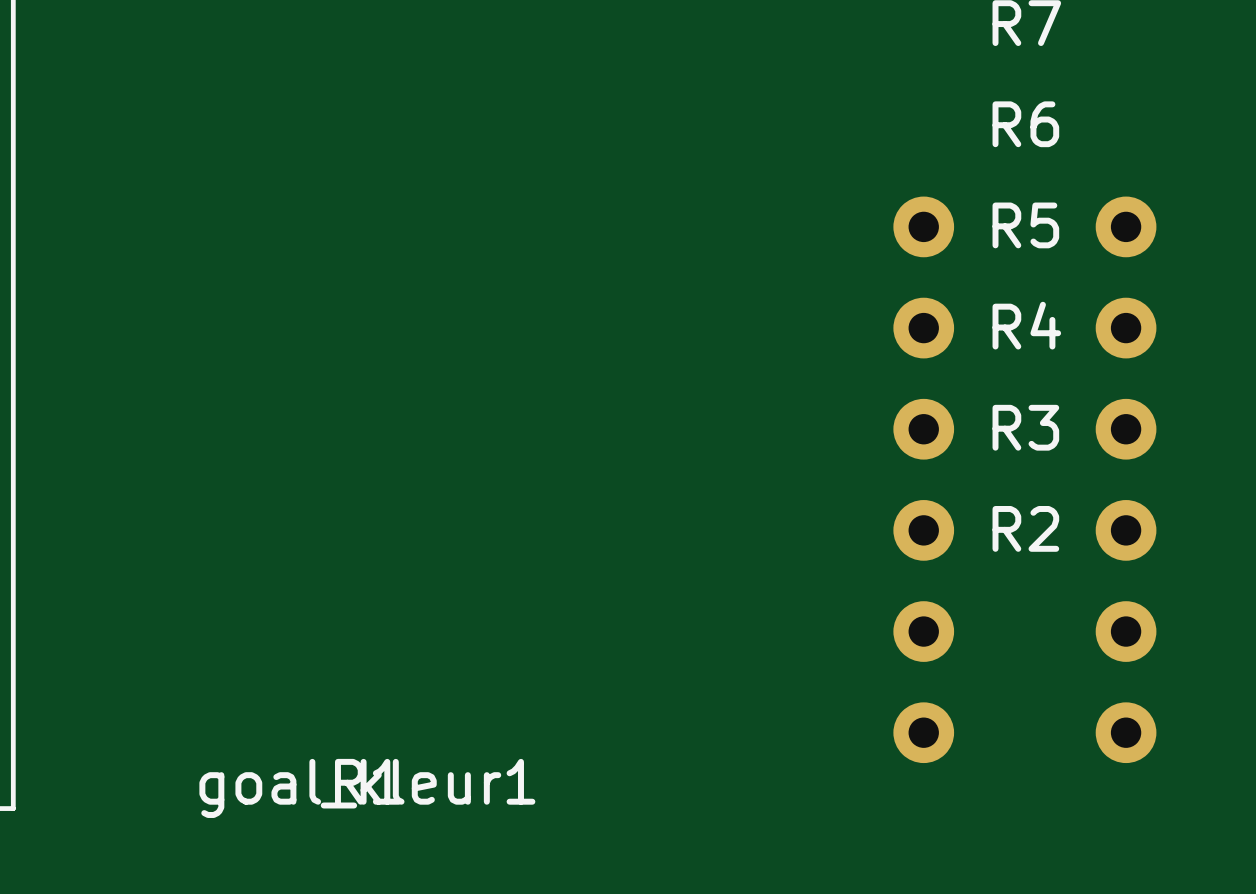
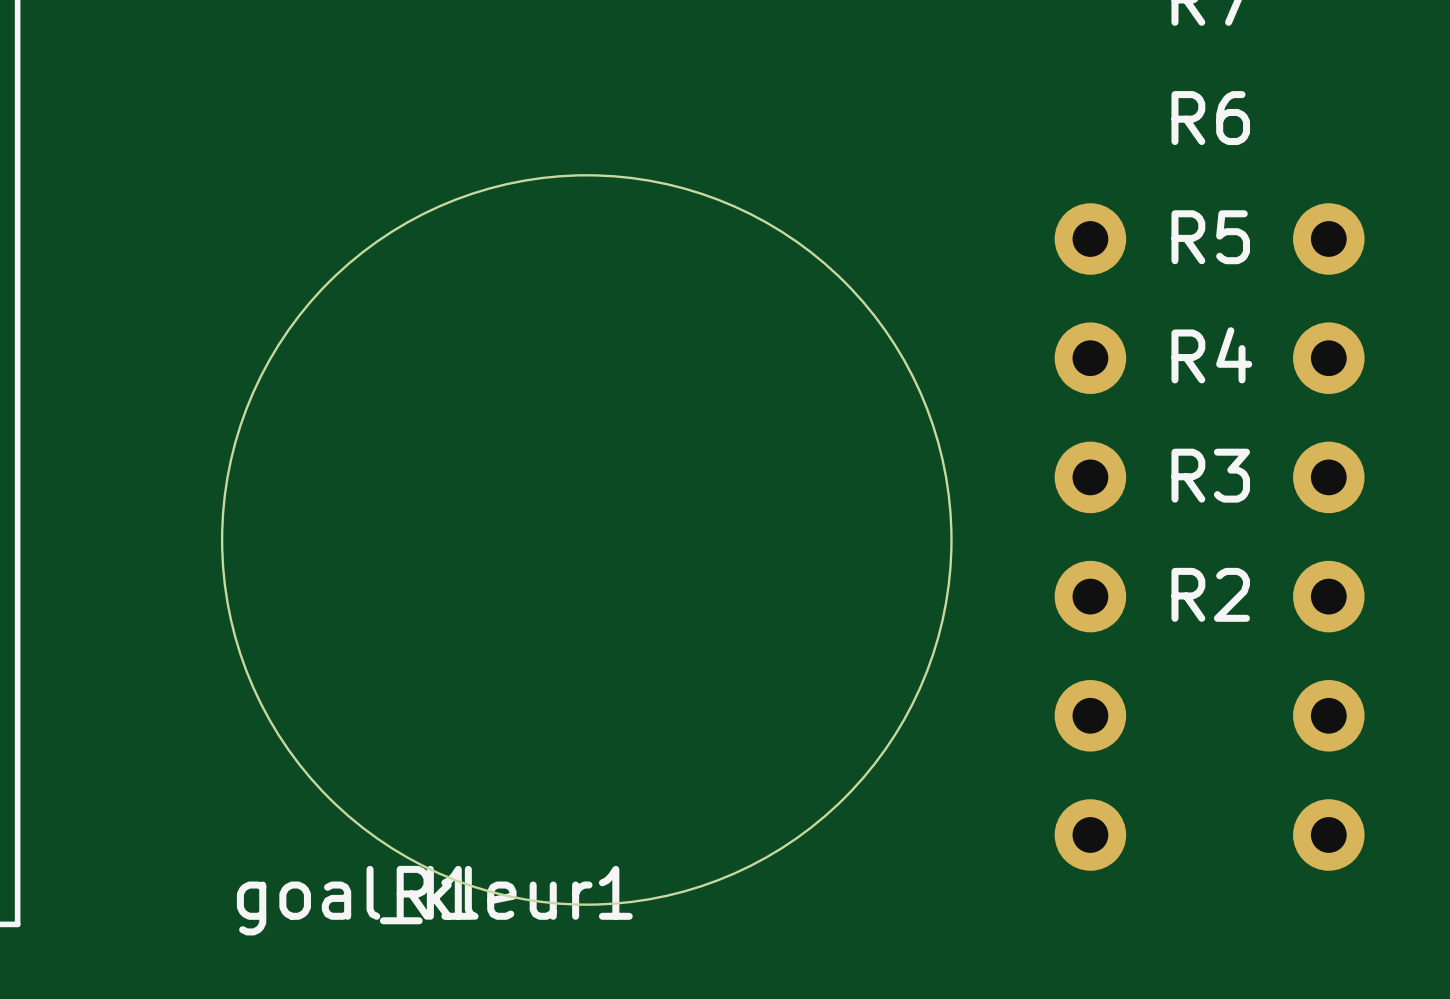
round board edge: none -> [220, 174, 953, 906]

